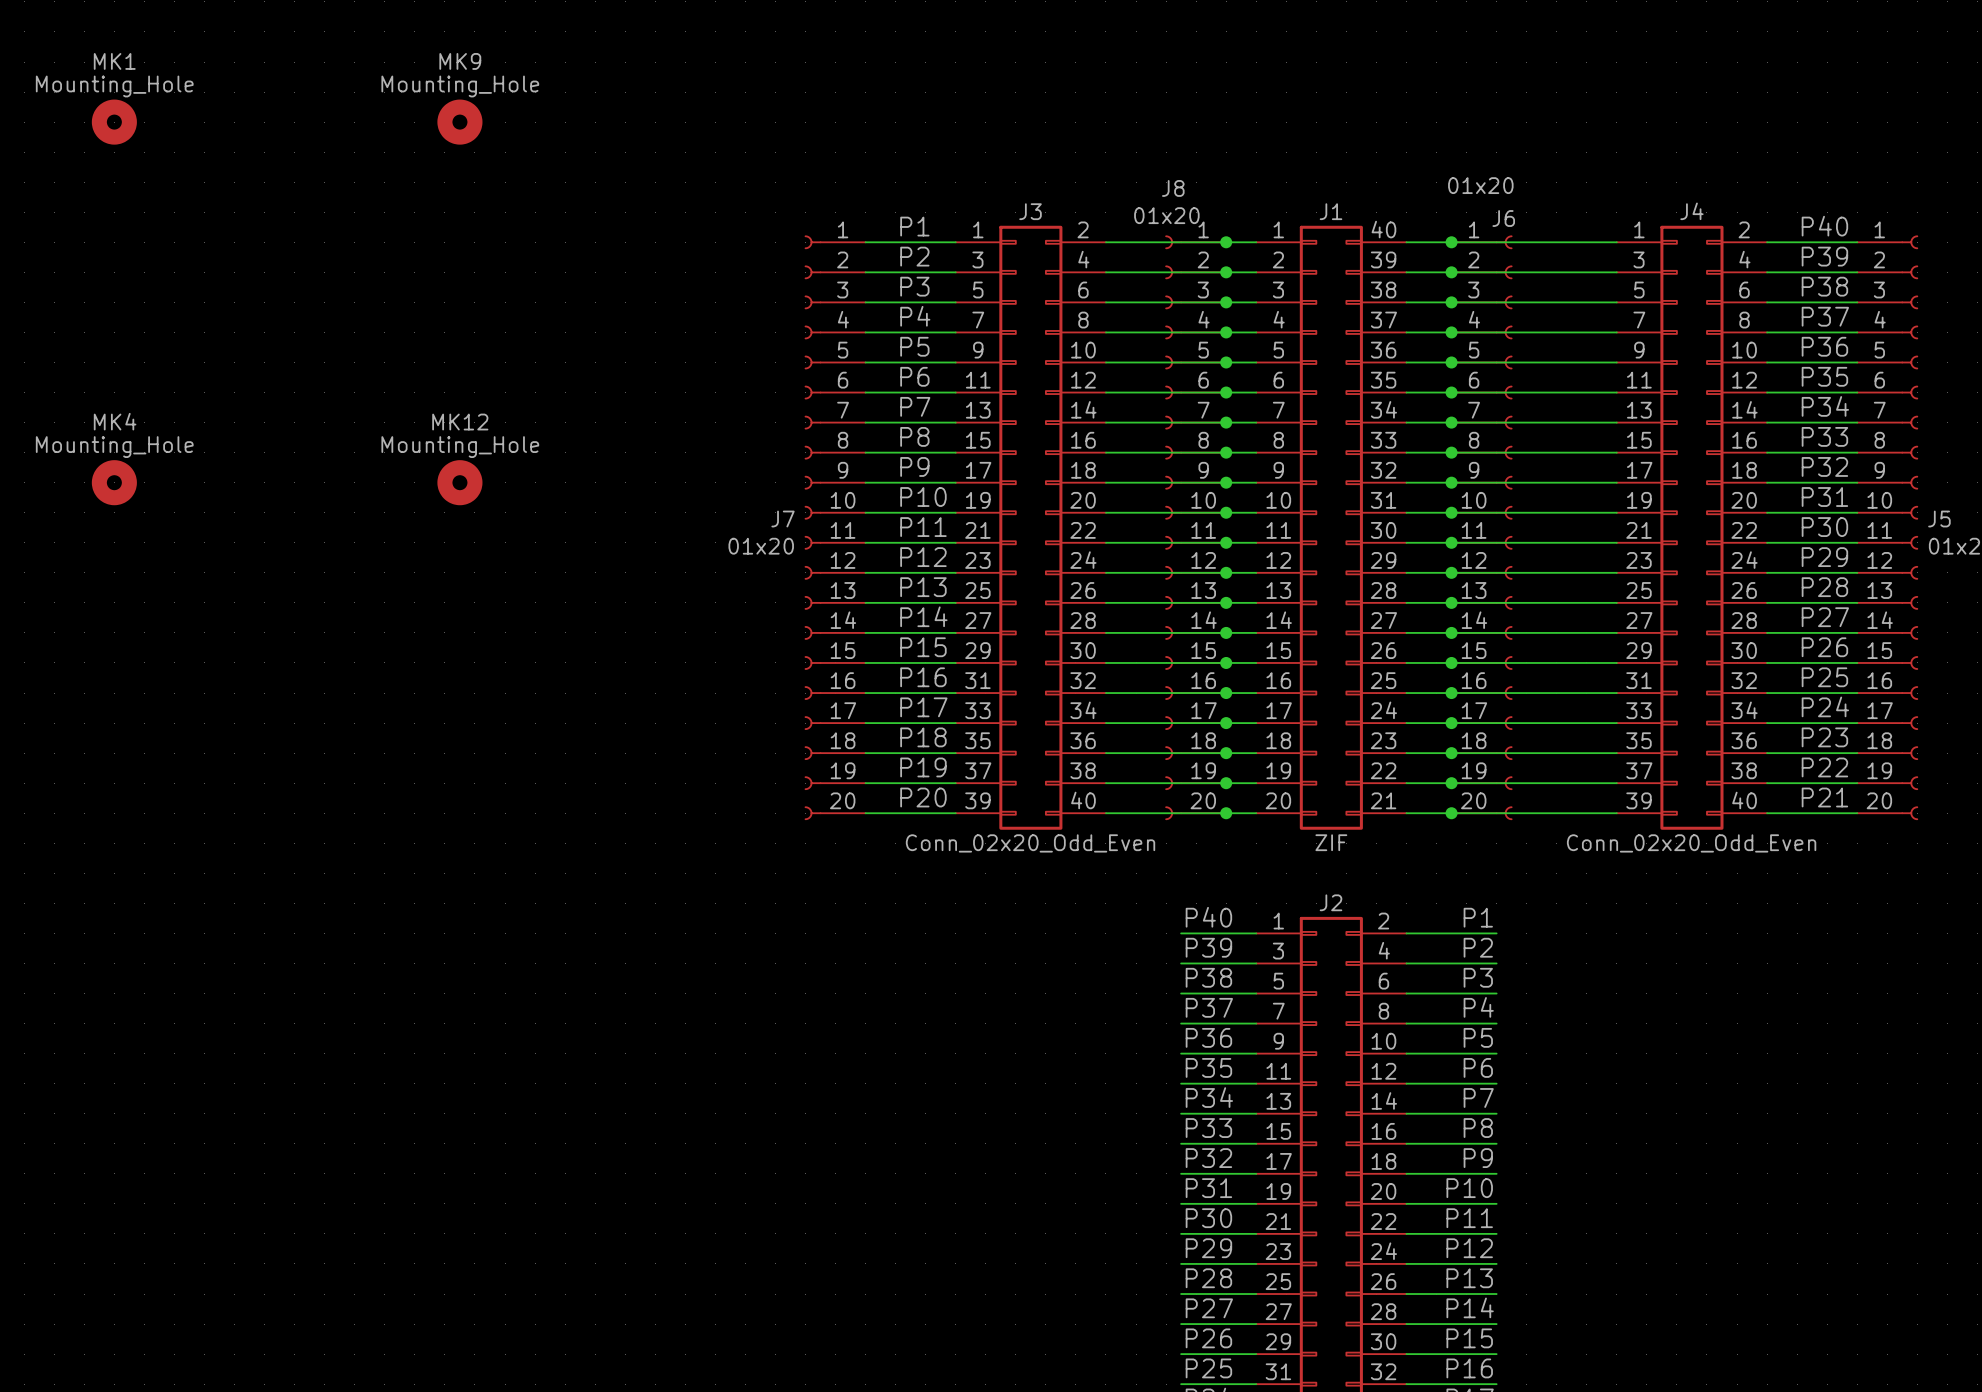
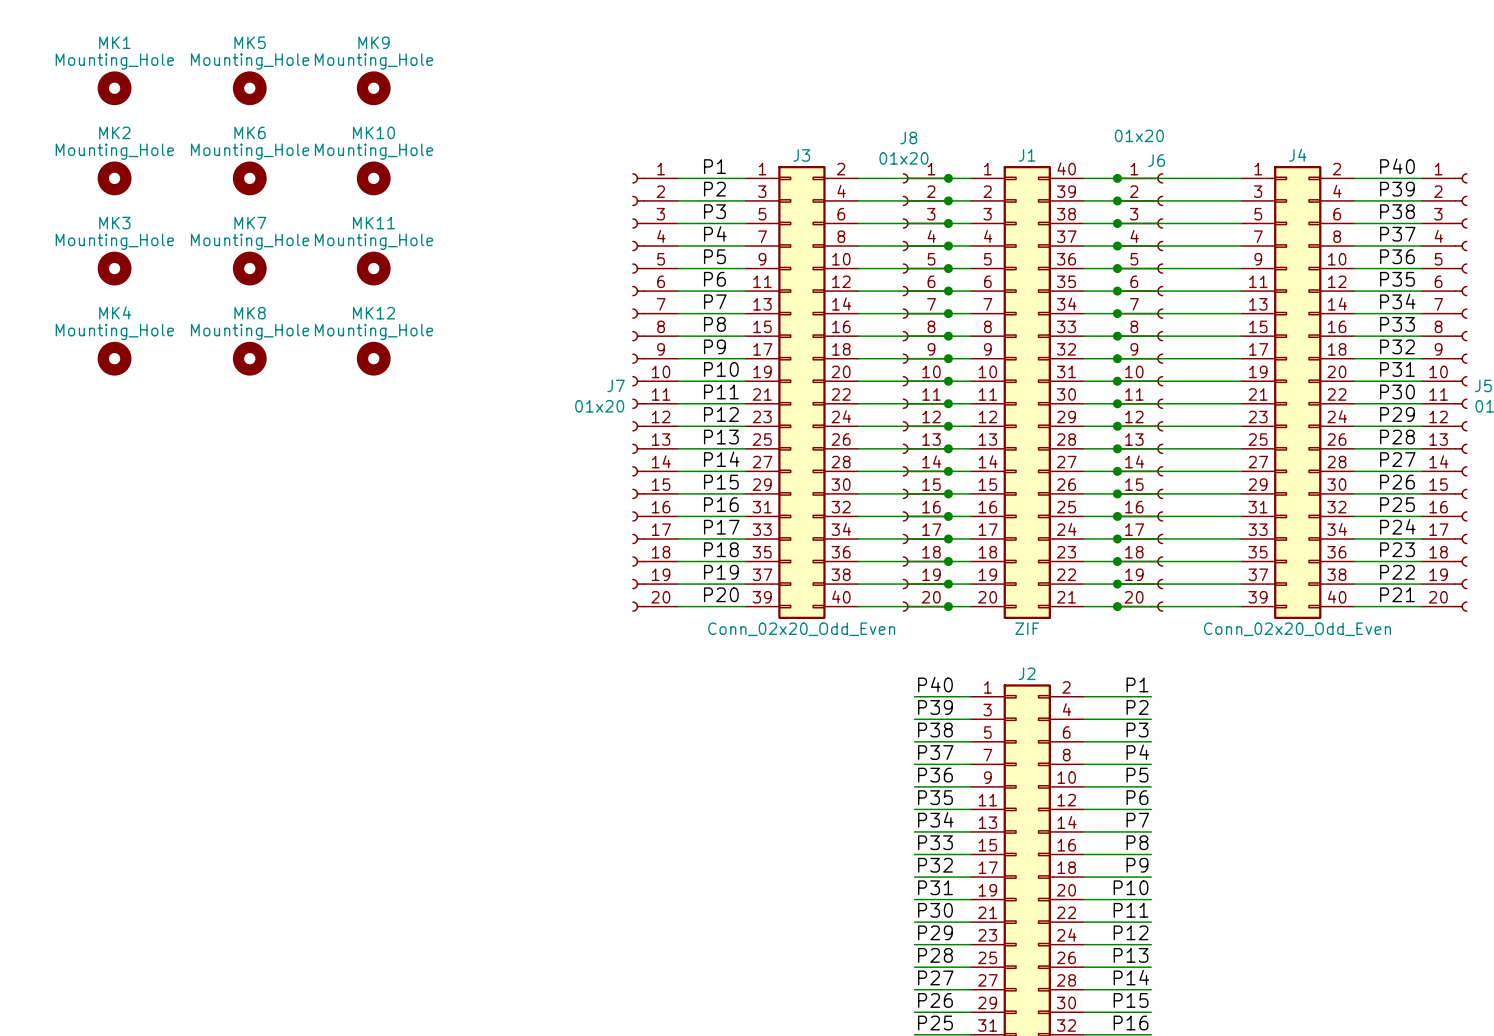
MK5: none -> Mounting_Hole (249, 88)
MK2: none -> Mounting_Hole (114, 178)
MK6: none -> Mounting_Hole (249, 178)
MK10: none -> Mounting_Hole (373, 178)
MK3: none -> Mounting_Hole (114, 268)
MK7: none -> Mounting_Hole (249, 268)
MK11: none -> Mounting_Hole (373, 268)
MK8: none -> Mounting_Hole (249, 358)

